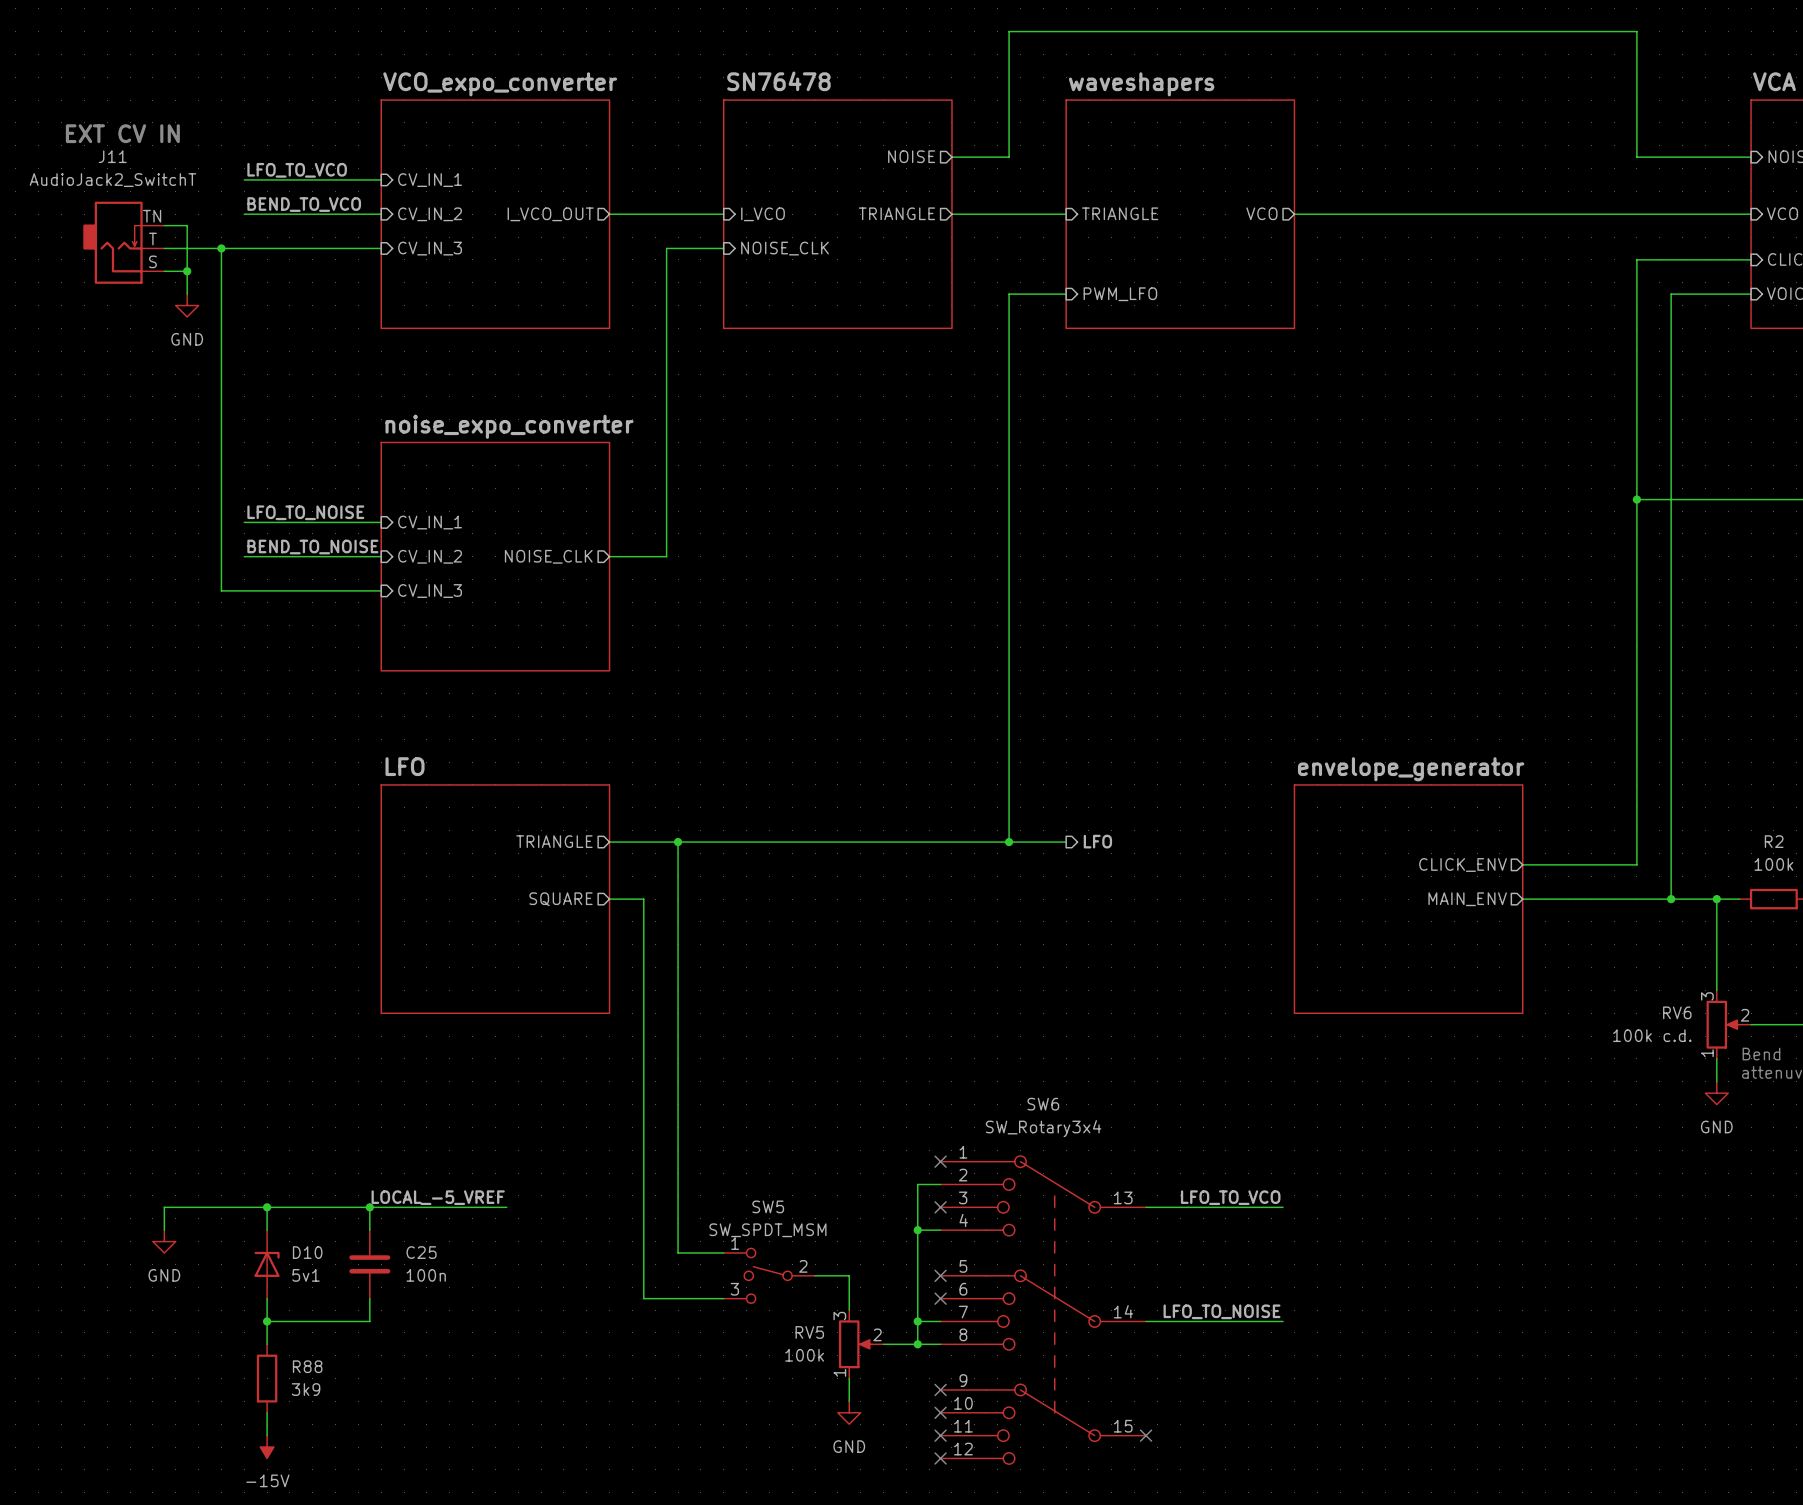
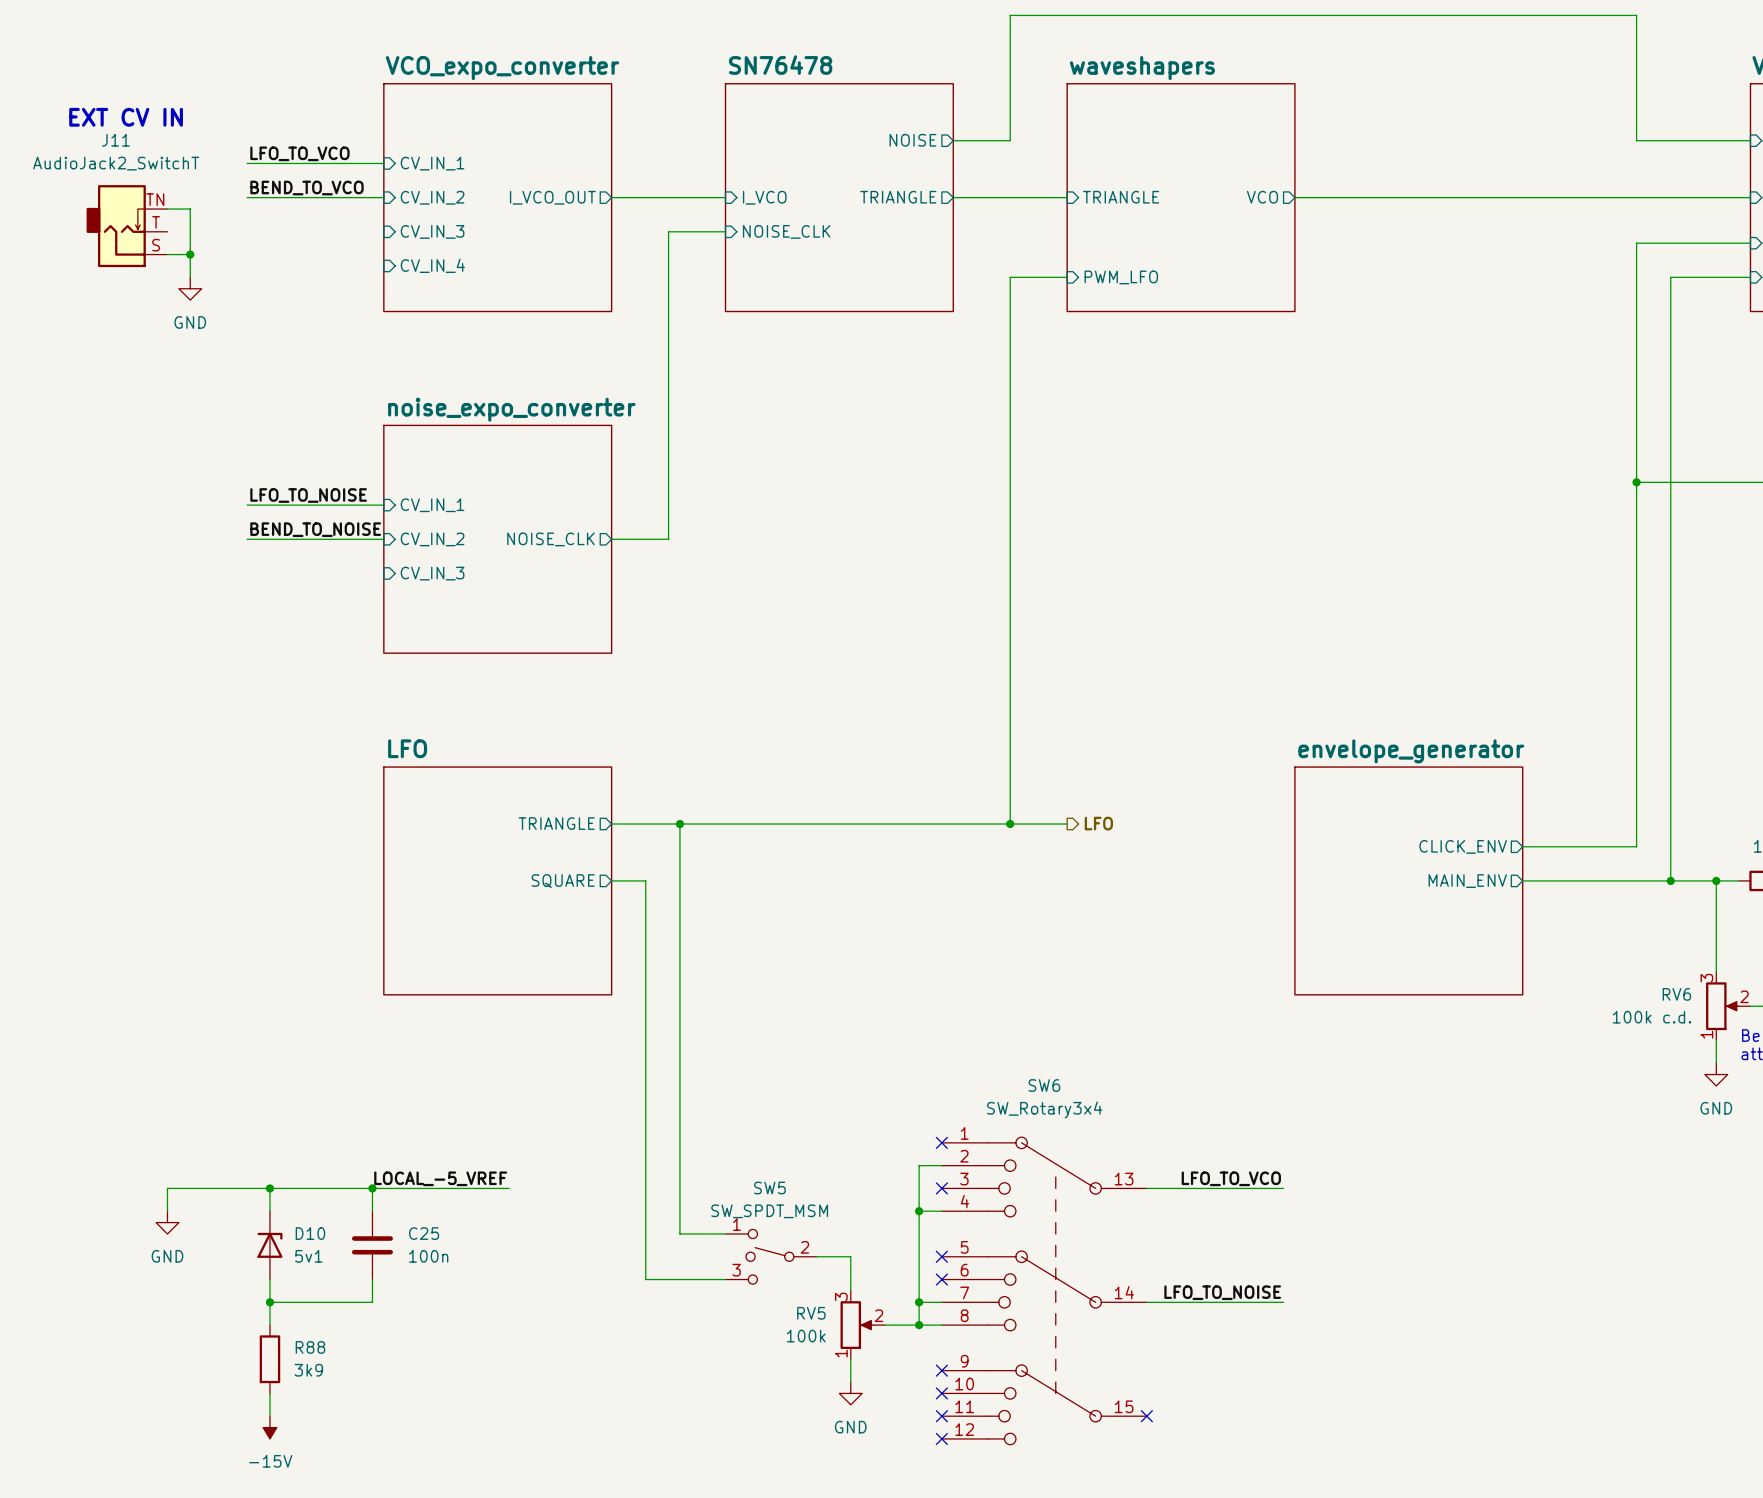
wire: (164, 248) (381, 248) -> none
wire: (221, 248) (221, 590) (381, 590) -> none
junction: (221, 248) -> none
sheet pin: none -> CV_IN_4 (432, 265)

